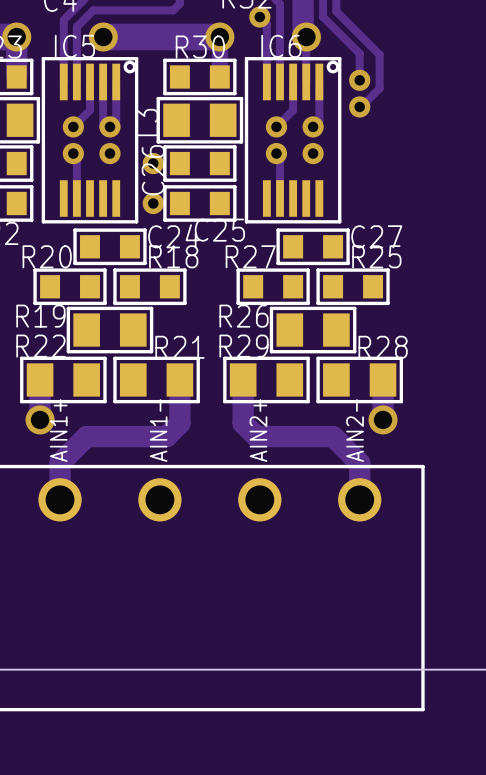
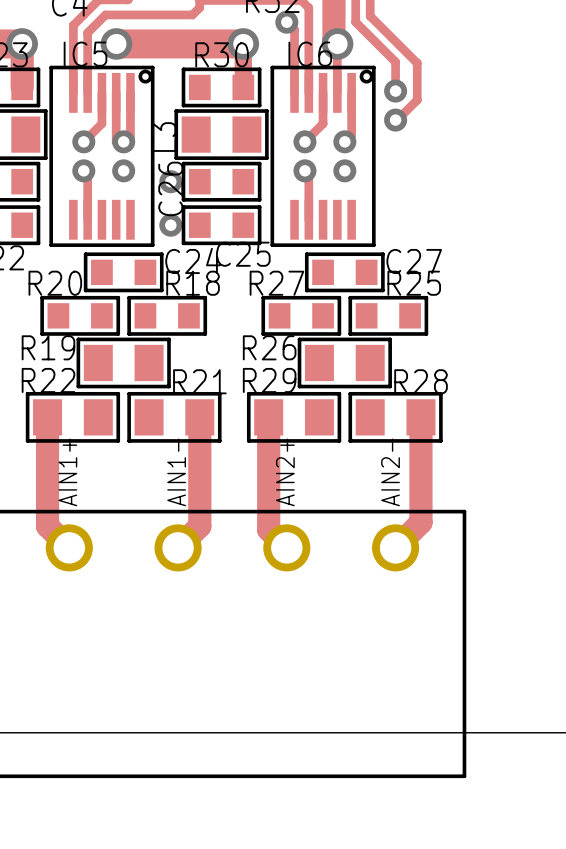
track: none -> (47, 460) (47, 526) (69, 547)
via: (40, 419) -> none
track: none -> (420, 460) (420, 522) (395, 547)
via: (383, 419) -> none
track: (179, 423) (166, 436) (86, 436) (60, 463) (60, 499) -> (199, 464) (199, 526) (178, 547)
track: (243, 423) (256, 436) (333, 436) (359, 463) (359, 499) -> (268, 464) (268, 529) (286, 547)

